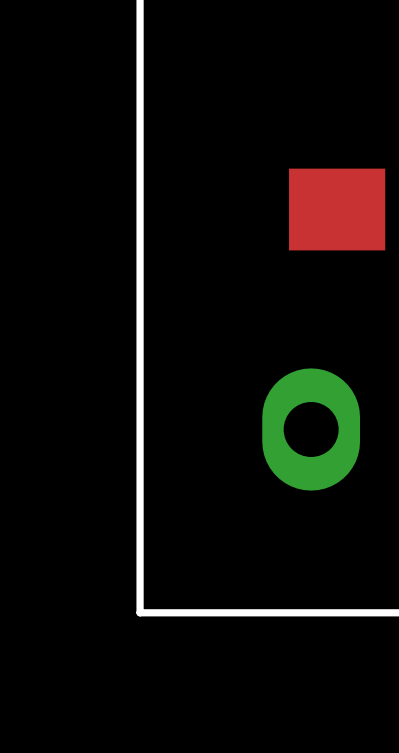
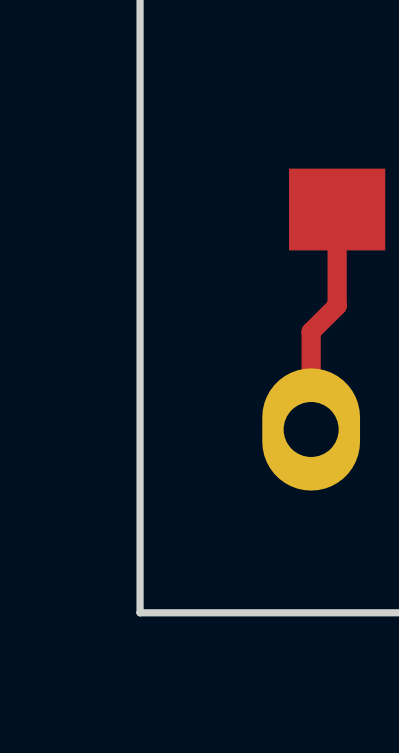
top track: none -> (337, 209) (337, 305) (311, 331) (311, 429)

